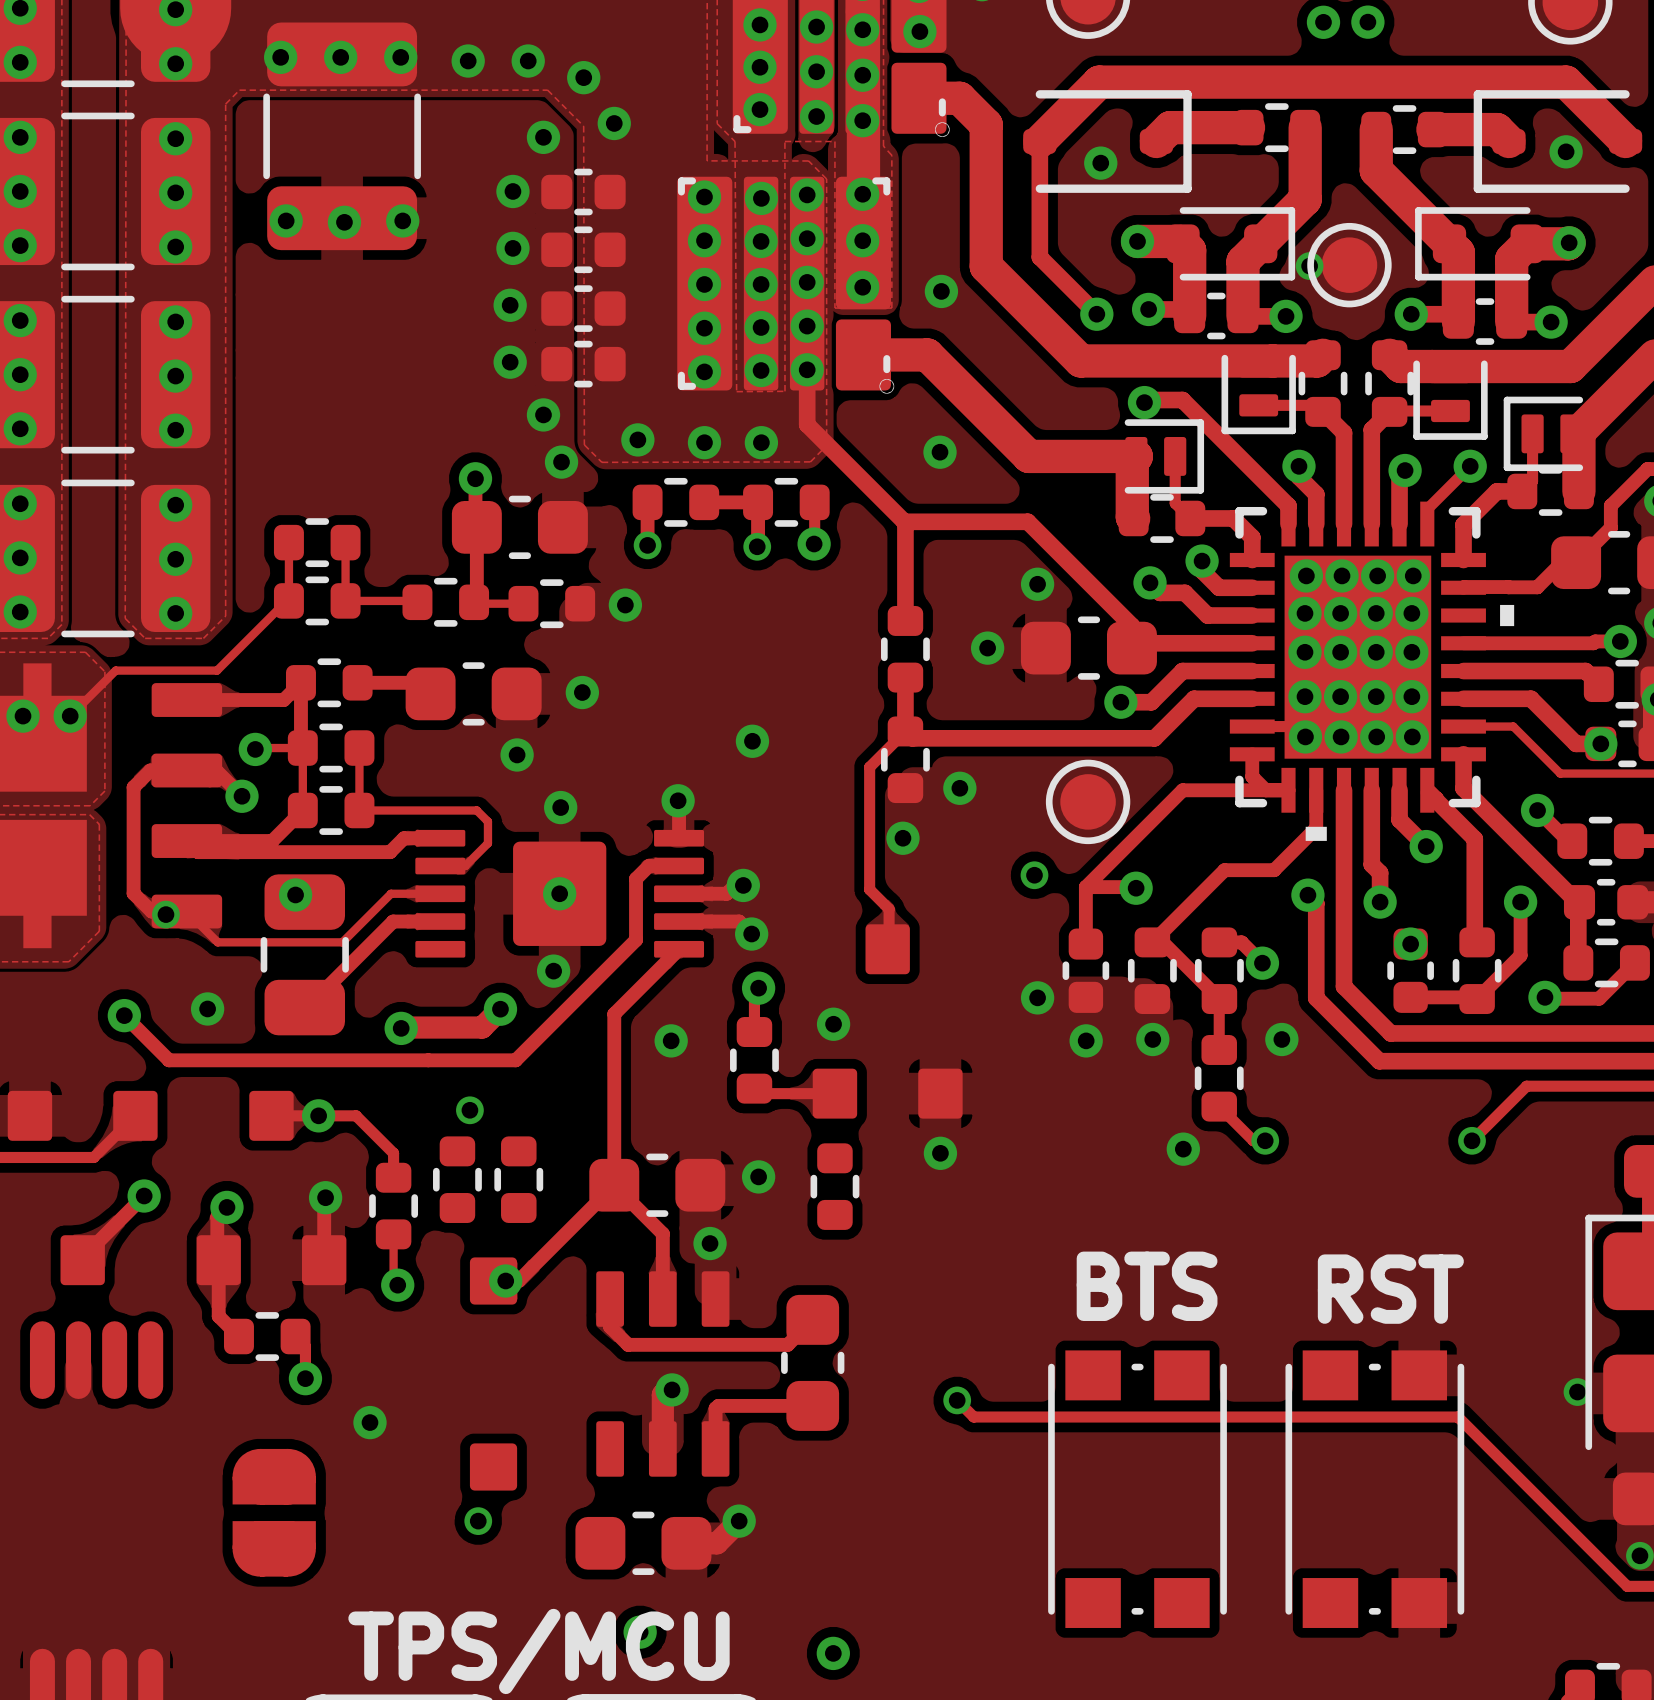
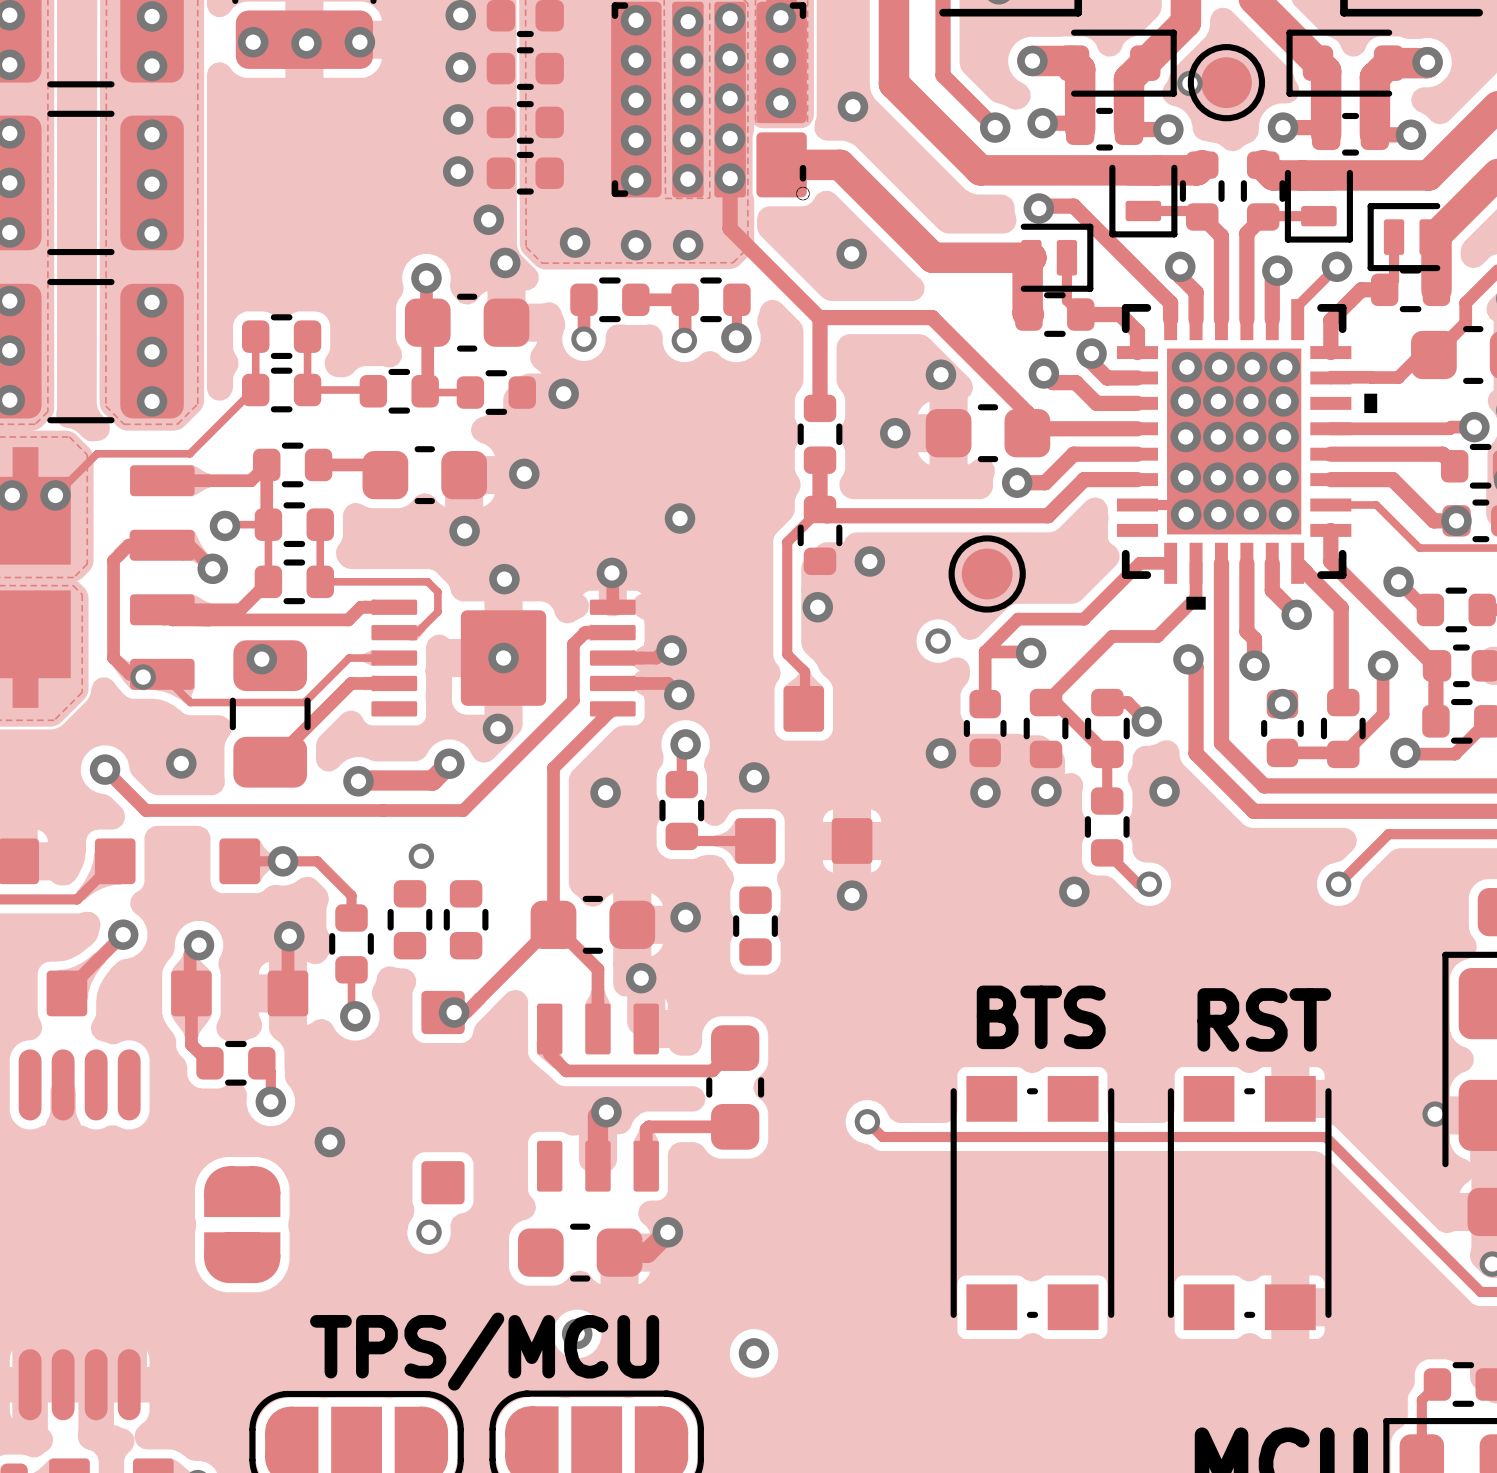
track: (1252, 754) (1252, 776) (1265, 790) -> none
track: (1254, 790) (1182, 790) (1121, 851) -> (1139, 563) (1083, 619) (1017, 619)

